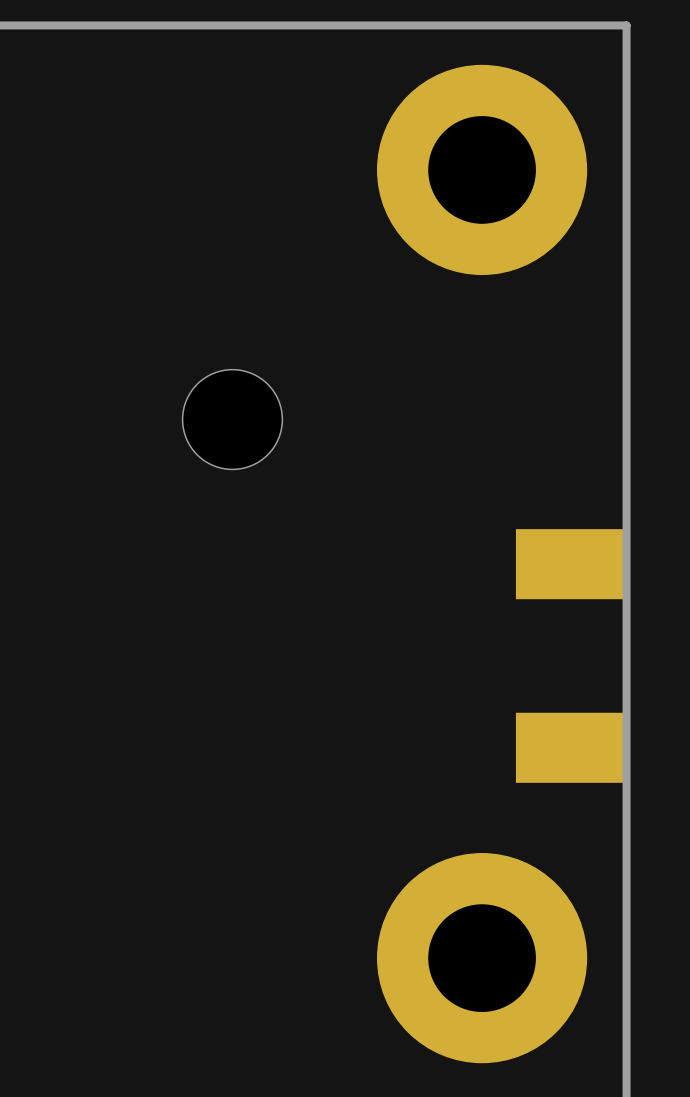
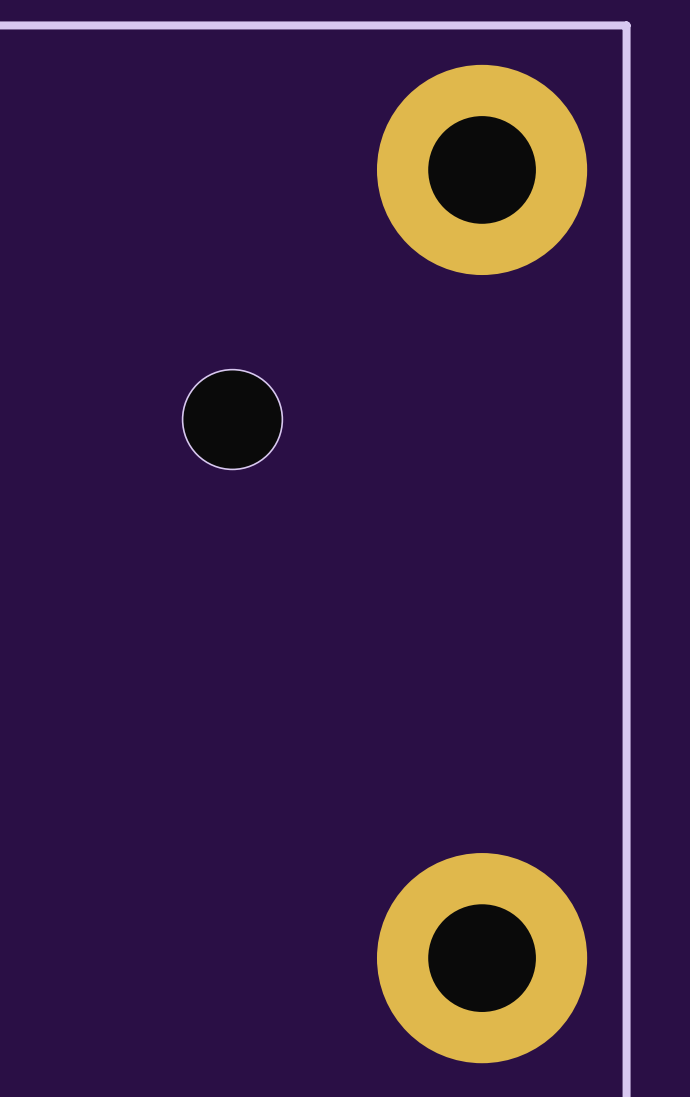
part: (571, 655) -> none

